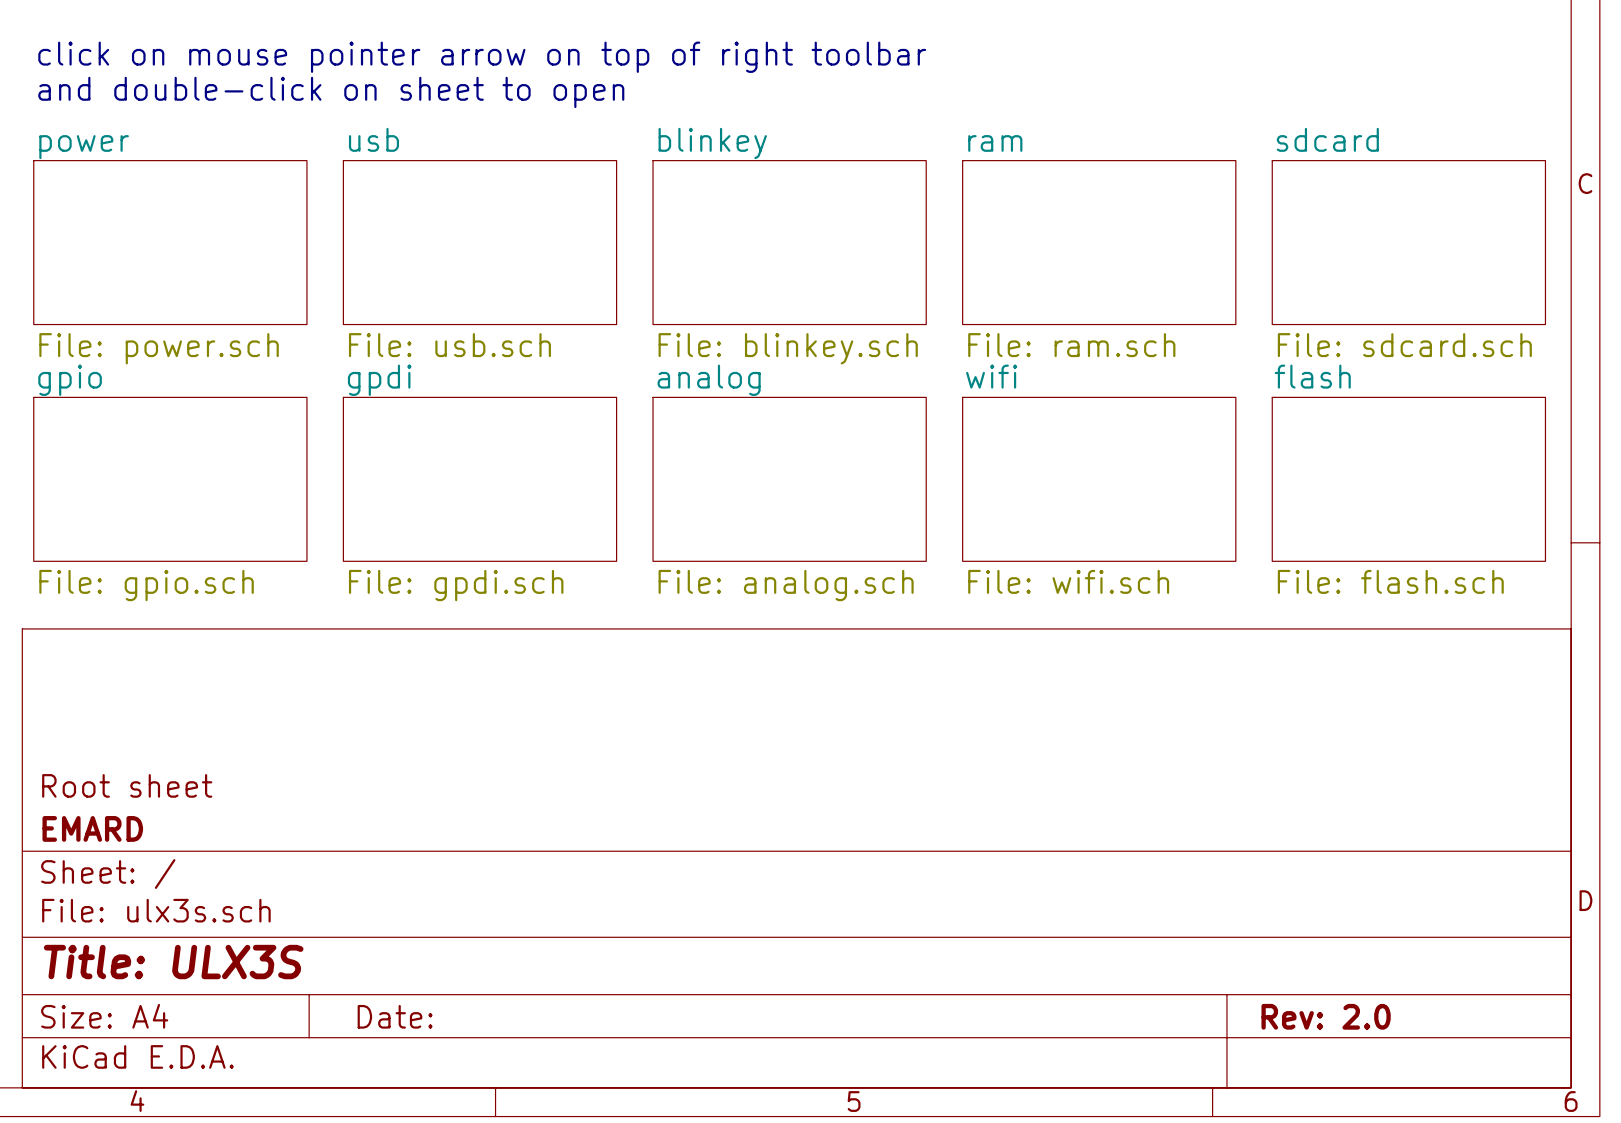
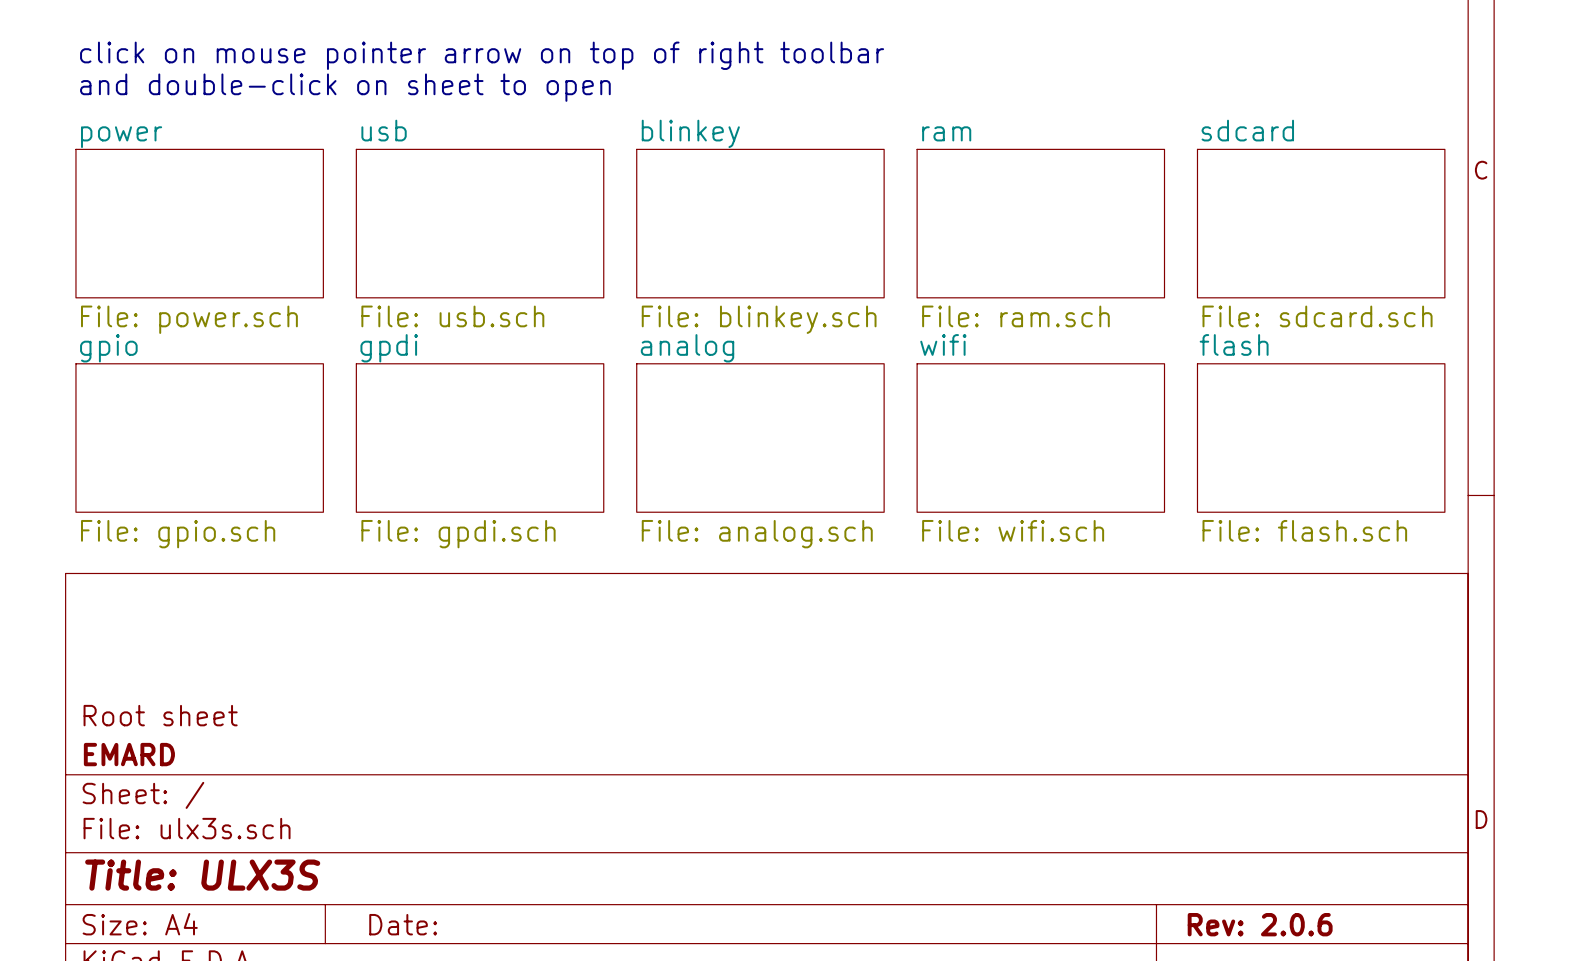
title block: Rev: 2.0 (1326, 1016) -> Rev: 2.0.6 (1260, 924)

